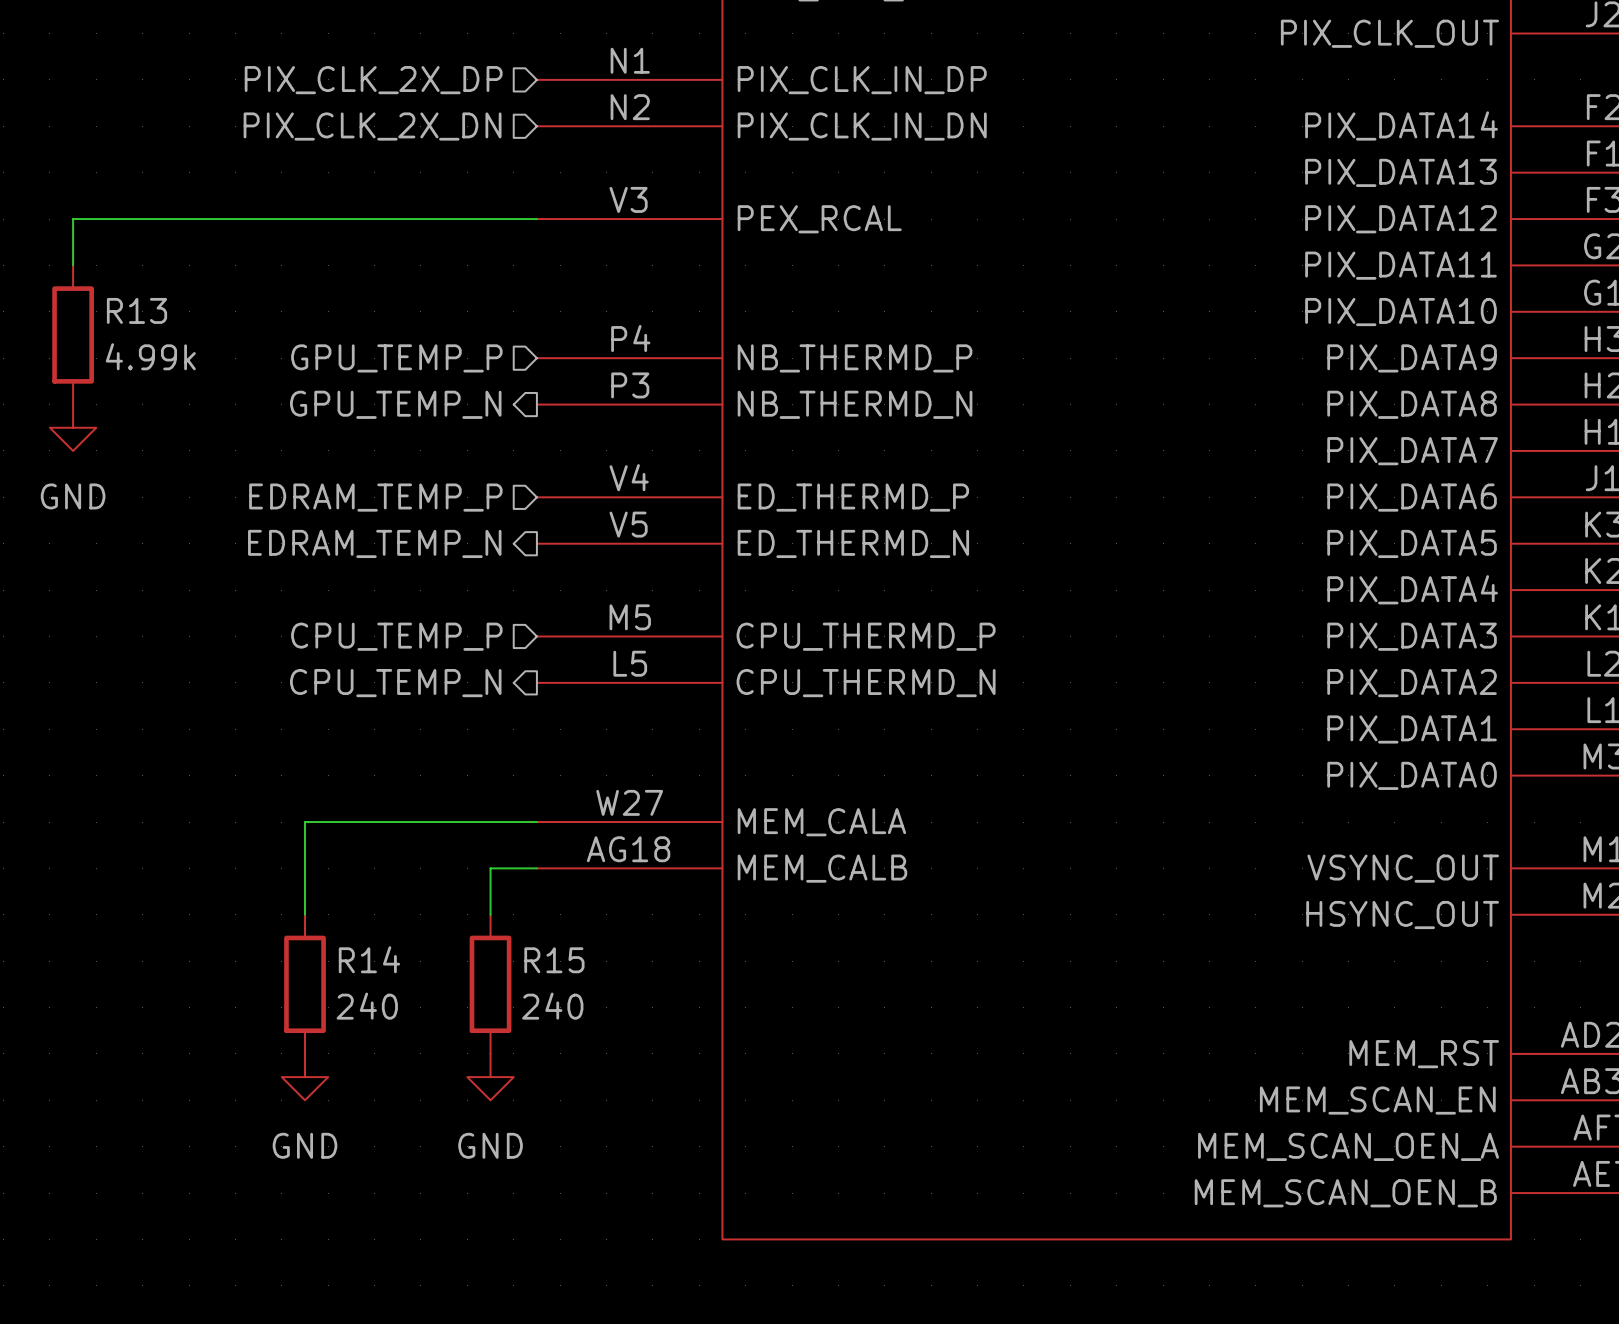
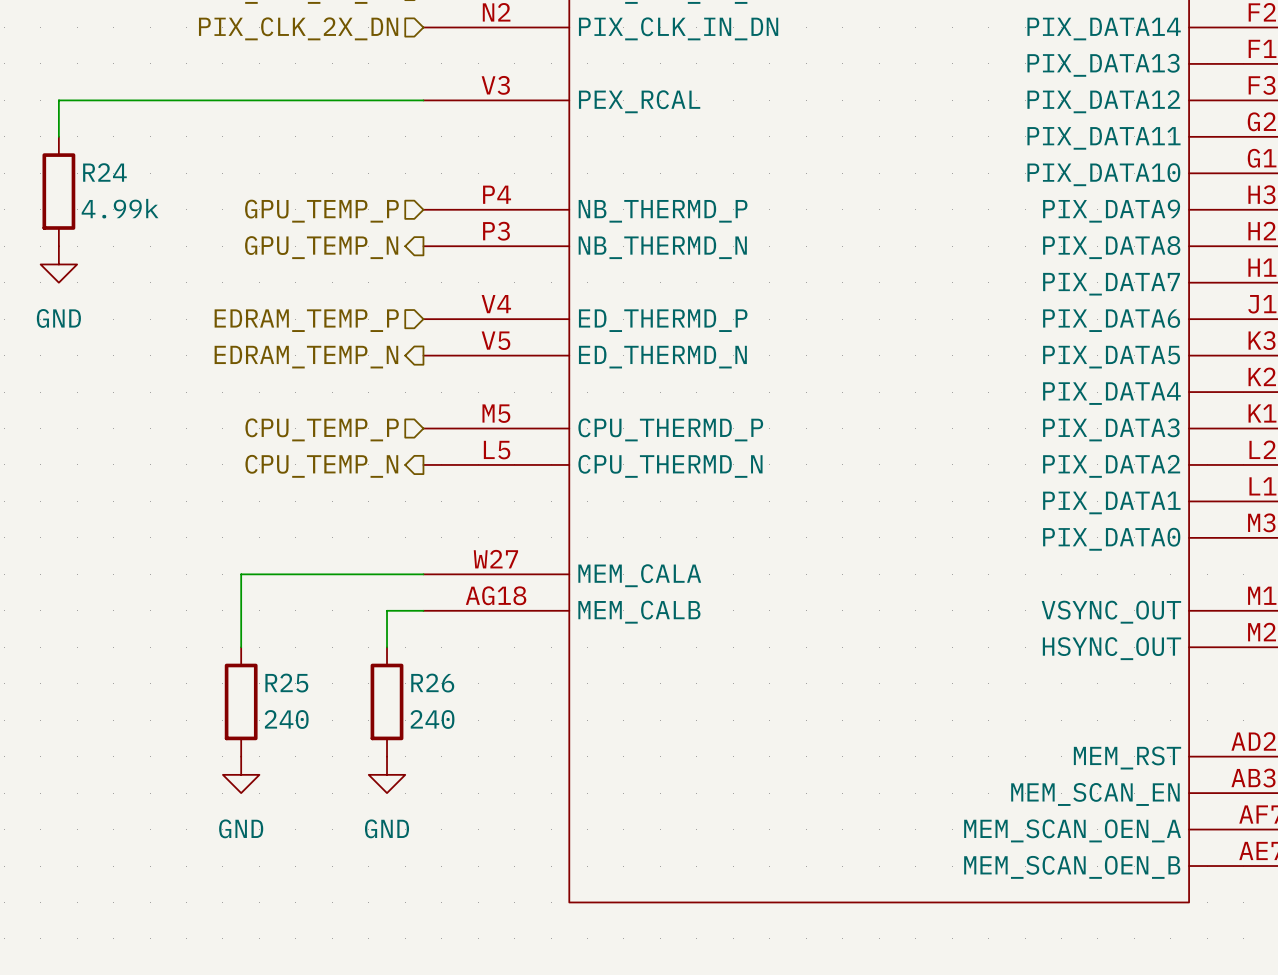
R13 name: R13 (136, 310) -> R24 (104, 172)
R14 name: R14 (369, 959) -> R25 (286, 683)
R15 name: R15 (554, 960) -> R26 (432, 683)

